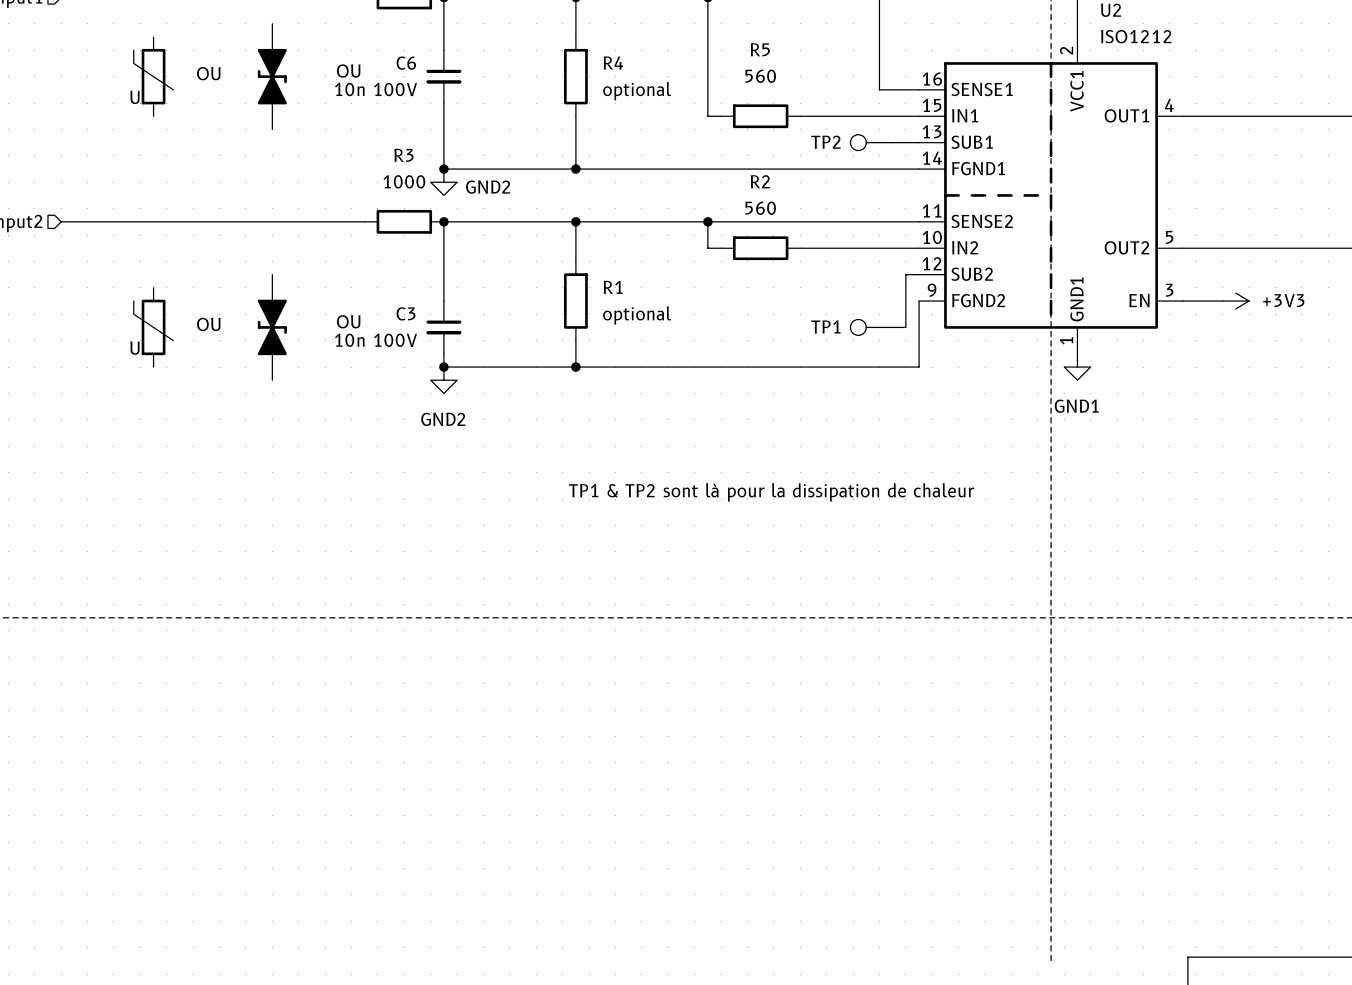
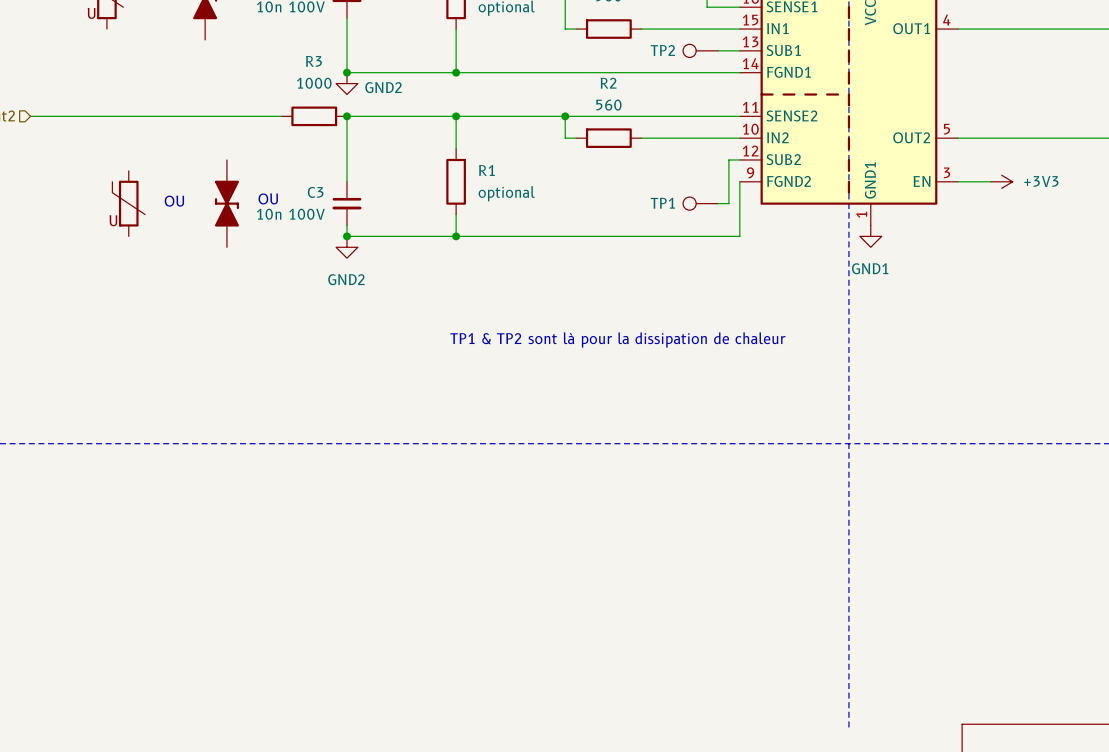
text position: OU (208, 324) -> OU (174, 201)
part position: (153, 327) -> (128, 203)
part position: (272, 327) -> (226, 203)

